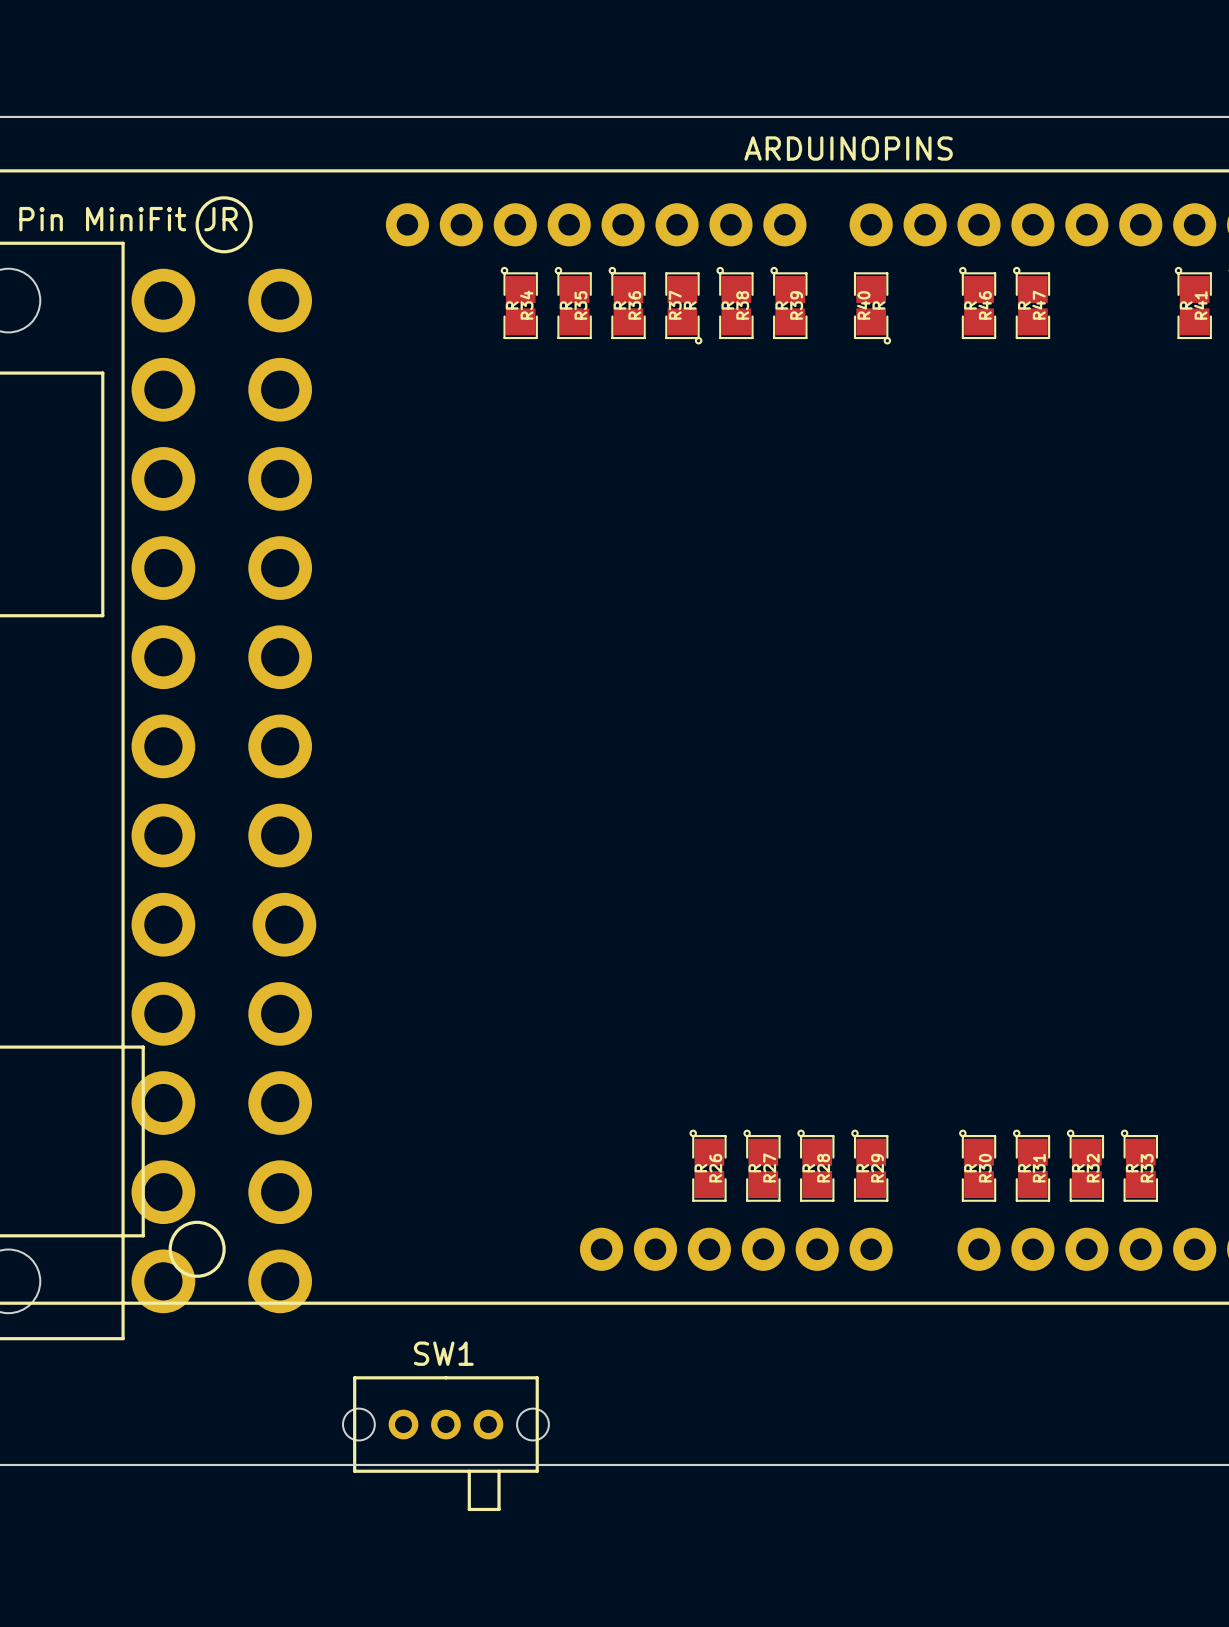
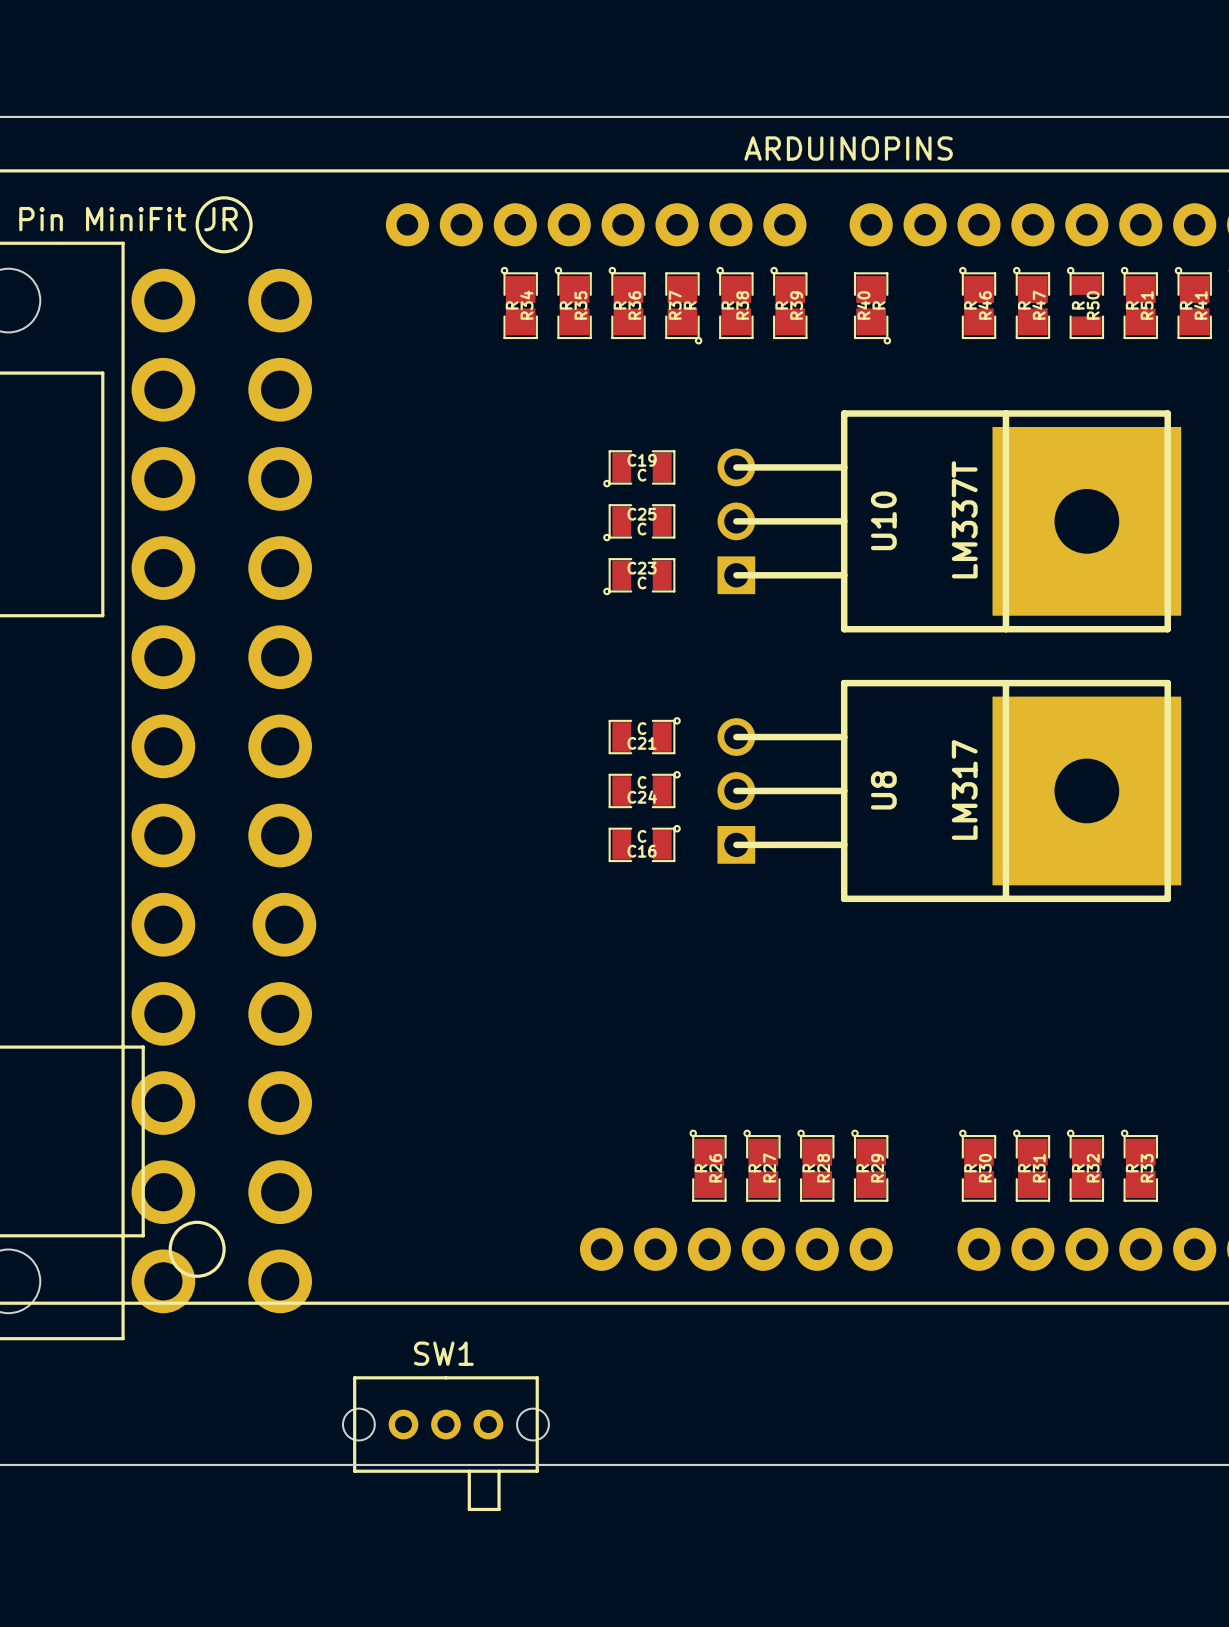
R50: none -> R (1085, 302)
R51: none -> R (1139, 302)
C19: none -> C (639, 468)
U10: none -> LM337T (949, 521)
C25: none -> C (639, 522)
C23: none -> C (639, 576)
C21: none -> C (644, 735)
C24: none -> C (644, 789)
U8: none -> LM317 (949, 790)
C16: none -> C (644, 843)

